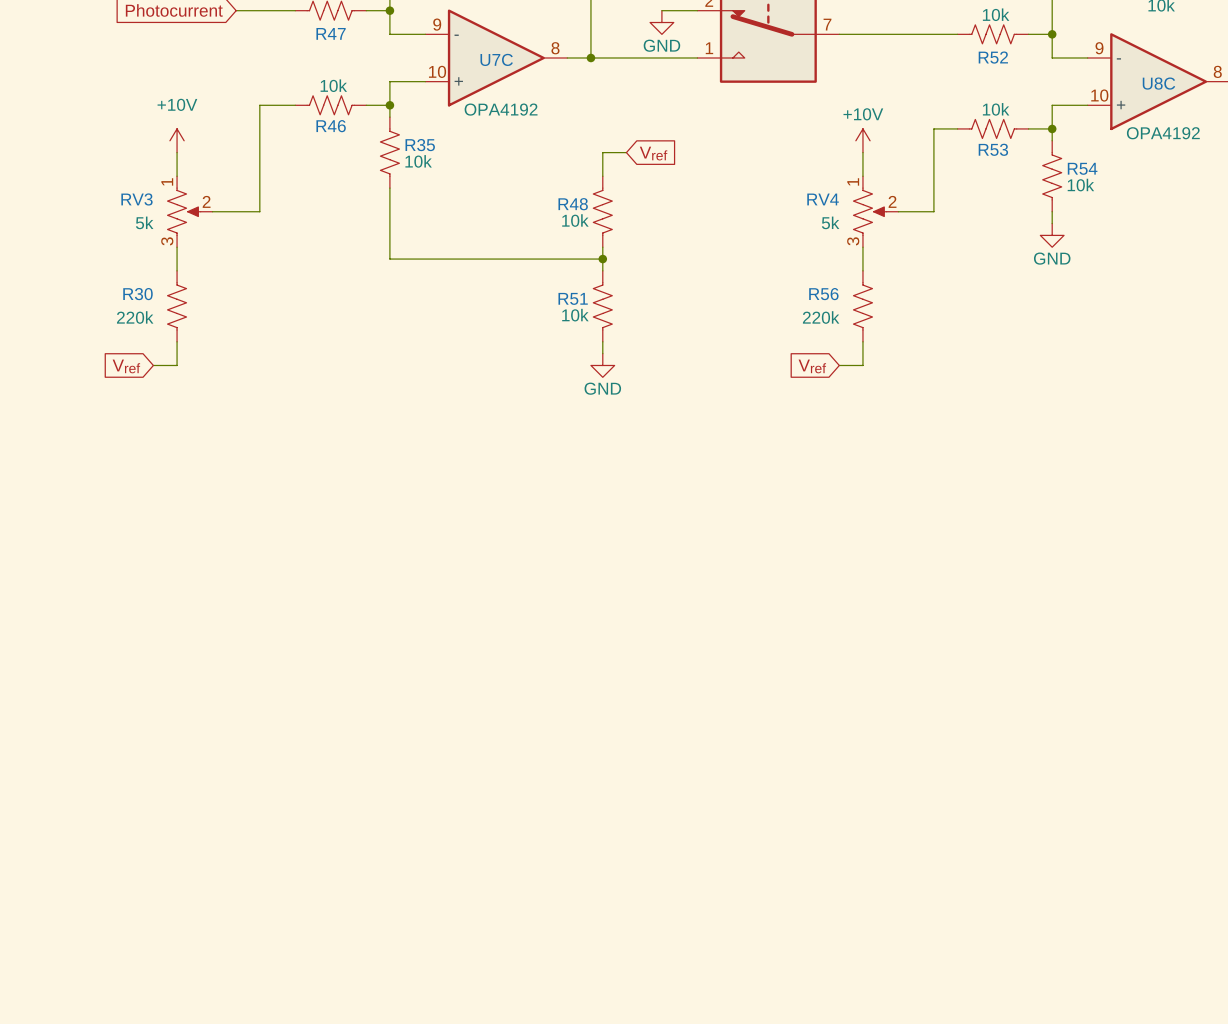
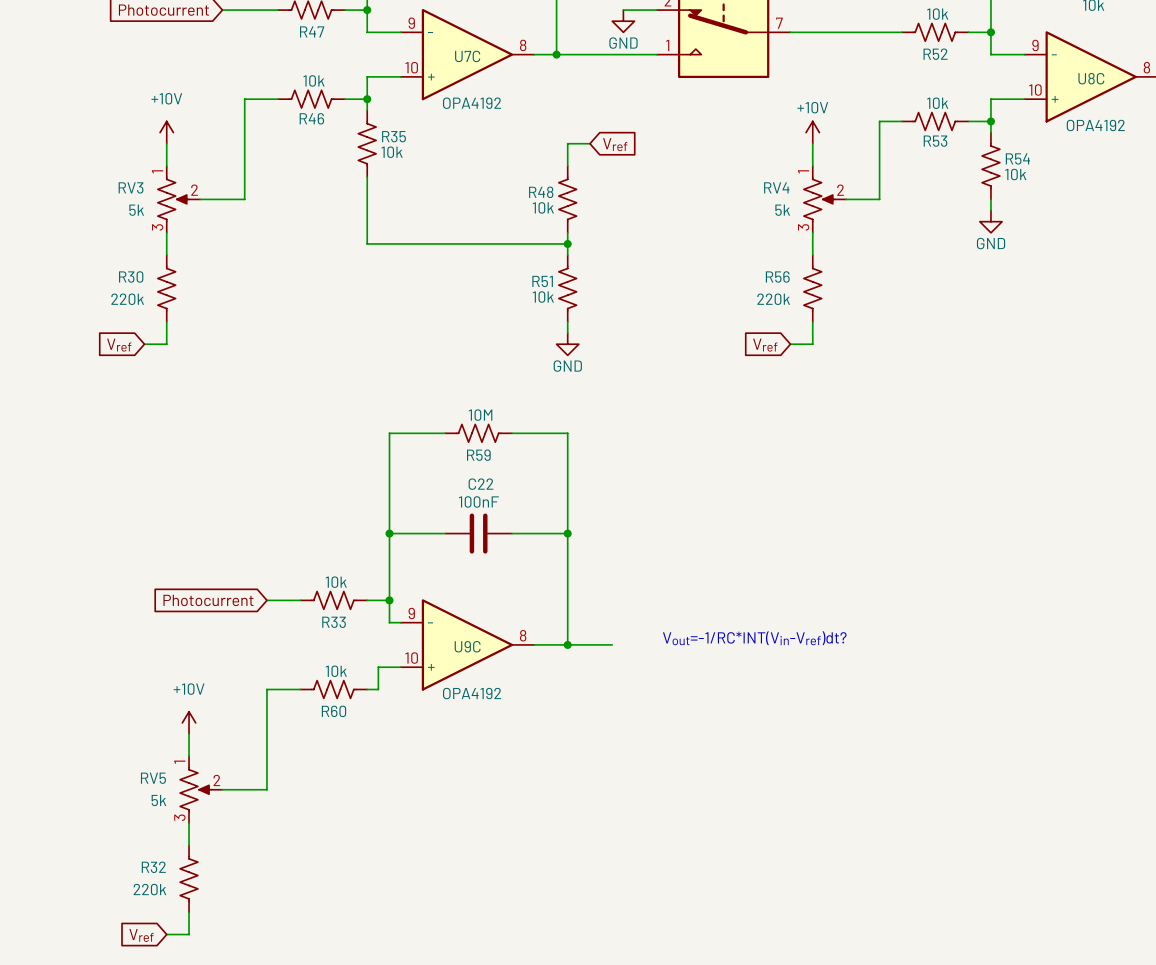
wire: none -> (445, 433) (389, 433) (389, 622) (400, 622)
R59: none -> 10M (478, 433)
wire: none -> (512, 433) (567, 433) (567, 644)
wire: none -> (389, 533) (445, 533)
junction: none -> (389, 533)
C22: none -> 100nF (478, 533)
wire: none -> (512, 533) (567, 533)
junction: none -> (567, 533)
global label: none -> Photocurrent (208, 600)
wire: none -> (266, 600) (300, 600)
R33: none -> 10k (333, 600)
wire: none -> (367, 600) (389, 600)
junction: none -> (389, 600)
text: none -> Vout=-1/RC*INT(Vin-Vref)dt? (754, 638)
U9C: none -> OPA4192 (467, 644)
wire: none -> (534, 644) (612, 644)
junction: none -> (567, 644)
wire: none -> (400, 667) (378, 667) (378, 689) (367, 689)
wire: none -> (300, 689) (266, 689) (266, 789) (222, 789)
R60: none -> 10k (333, 689)
power symbol: none -> +10V (189, 722)
wire: none -> (189, 734) (189, 756)
RV5: none -> 5k (201, 789)
wire: none -> (189, 823) (189, 845)
R32: none -> 220k (189, 878)
wire: none -> (189, 912) (189, 934) (166, 934)
global label: none -> Vref (141, 935)

